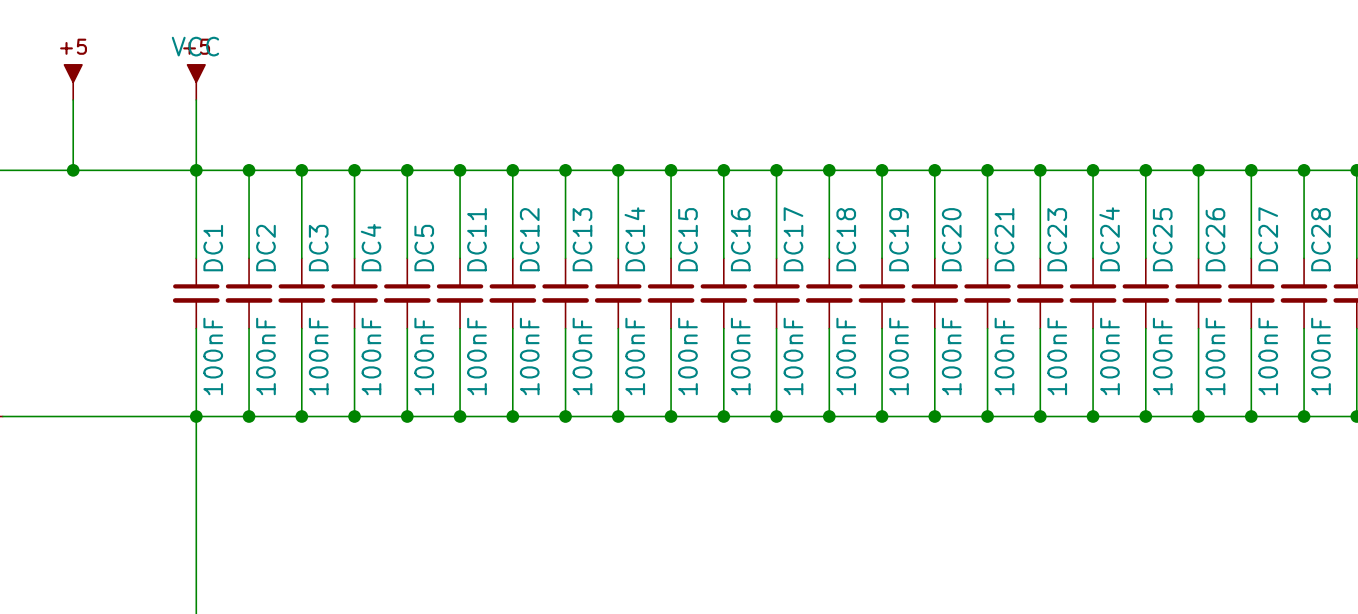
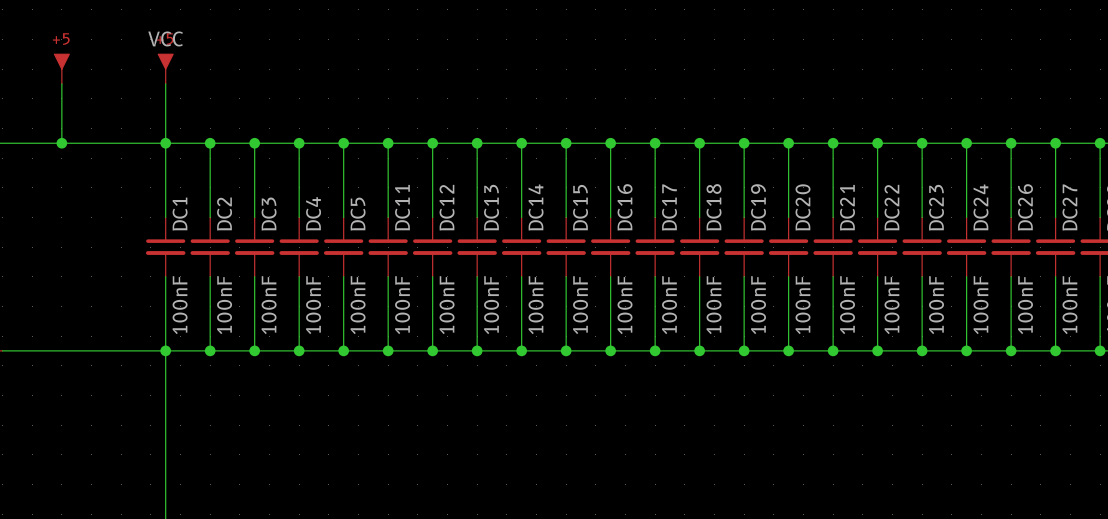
DC23 name: DC23 (1057, 239) -> DC22 (892, 207)
DC24 name: DC24 (1109, 239) -> DC23 (936, 207)
DC25 name: DC25 (1162, 239) -> DC24 (980, 207)

